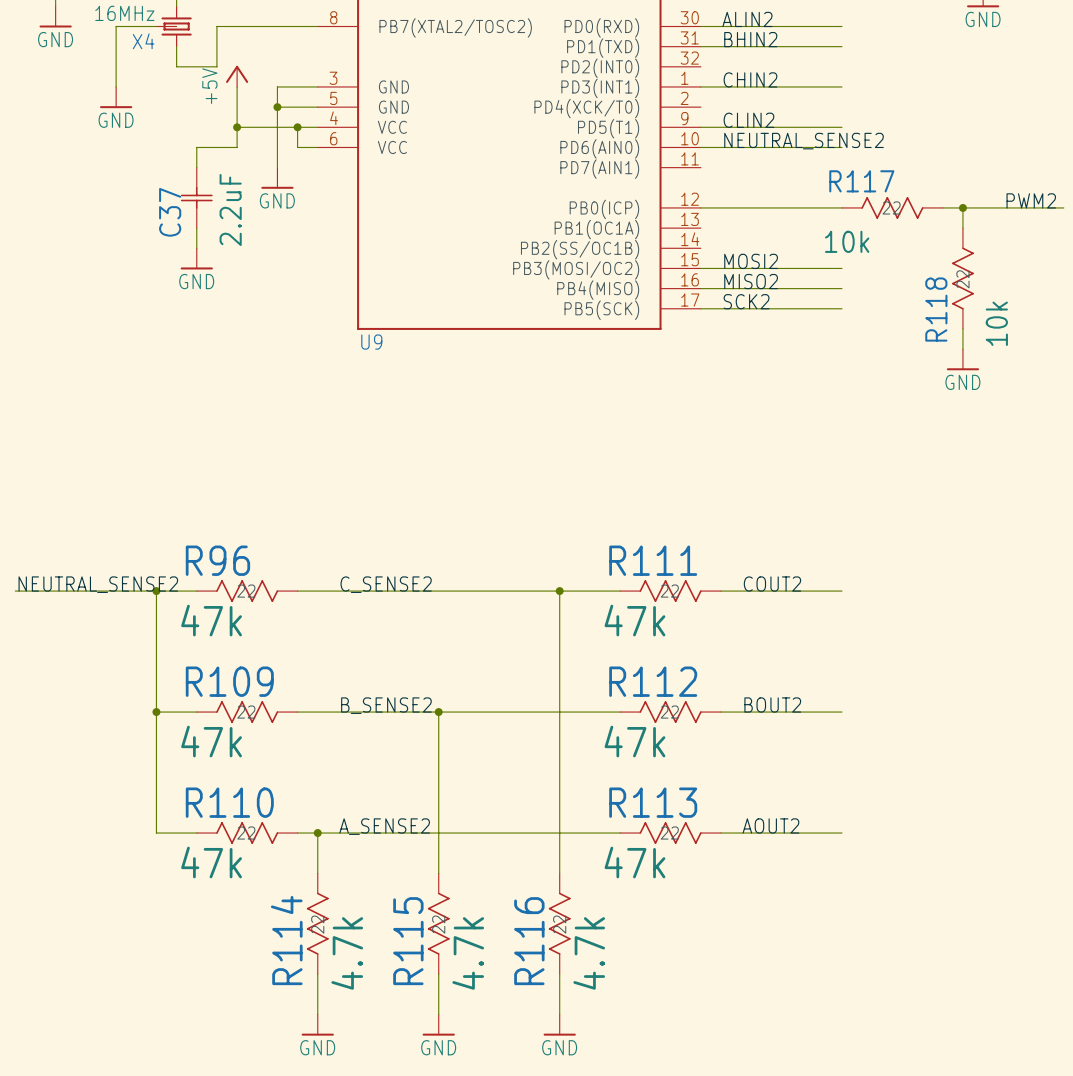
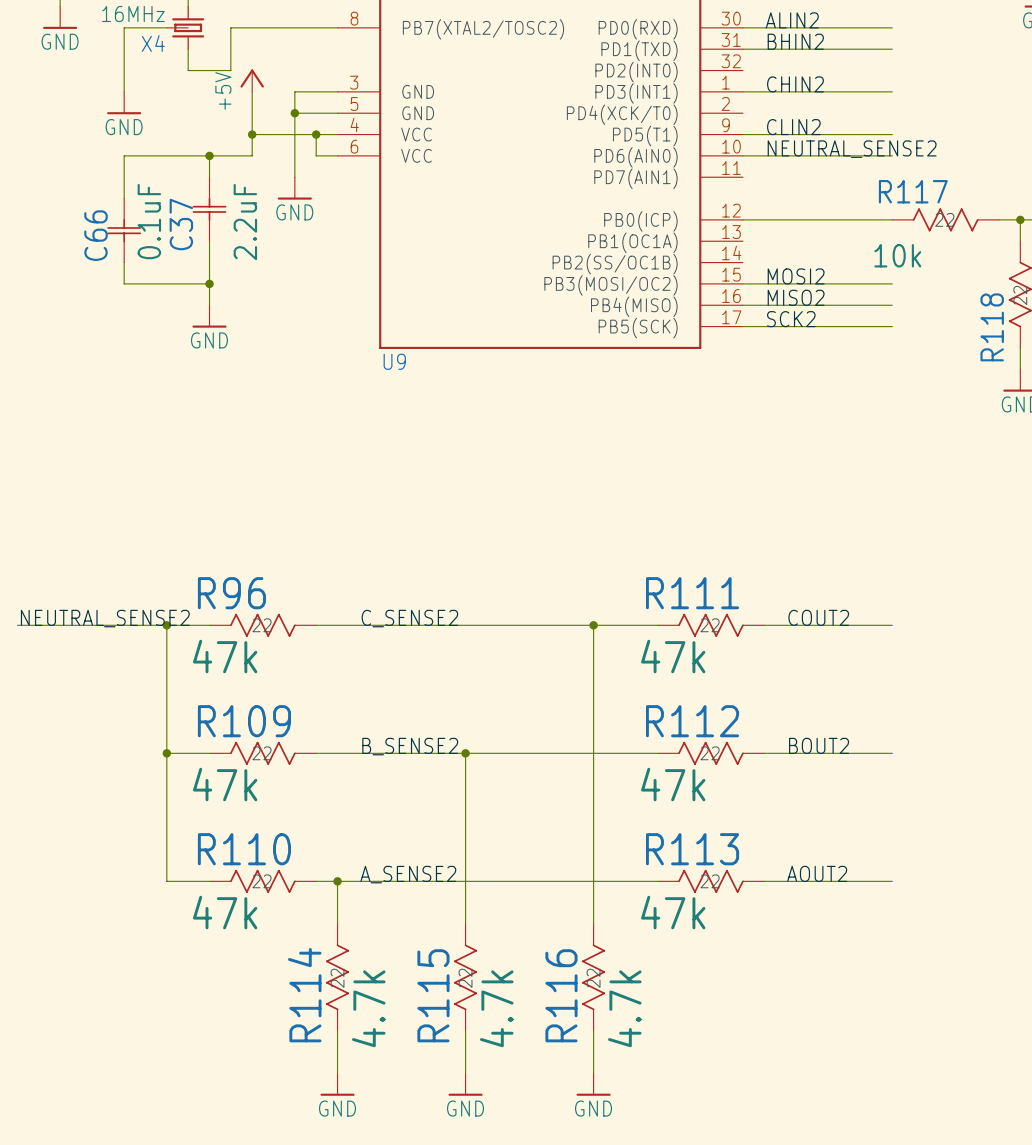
wire: none -> (209, 155) (124, 155) (124, 198)
junction: none -> (209, 155)
C66: none -> 0.1uF (124, 230)
wire: none -> (124, 262) (124, 283) (209, 283)
power symbol position: GND (196, 258) -> GND (209, 316)
junction: none -> (209, 283)

